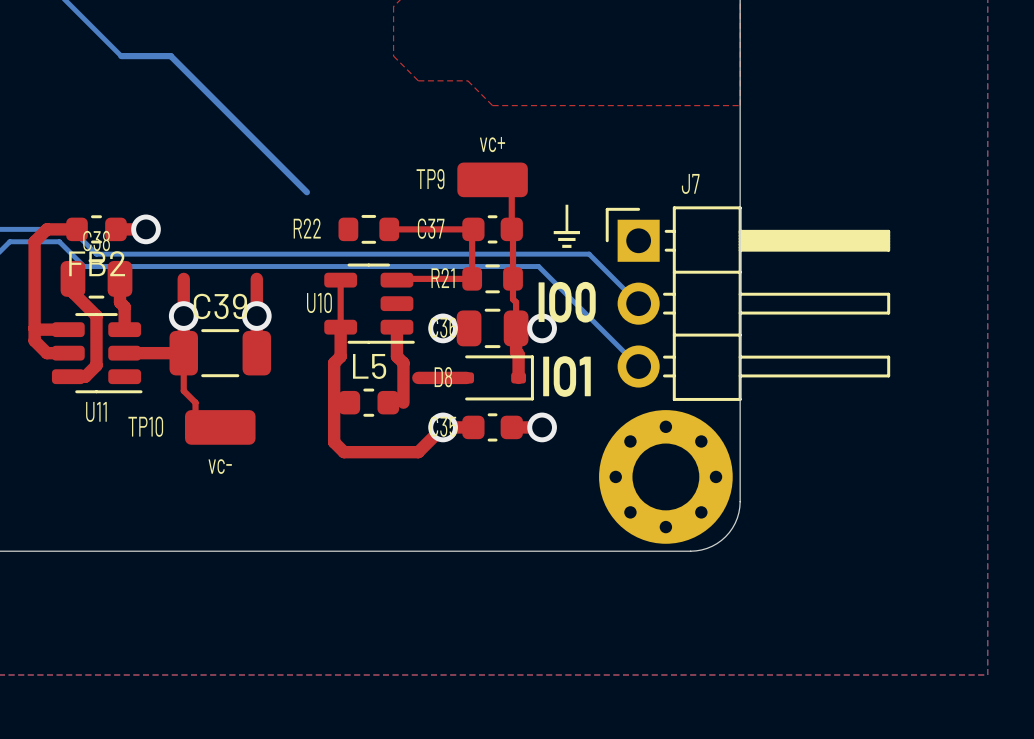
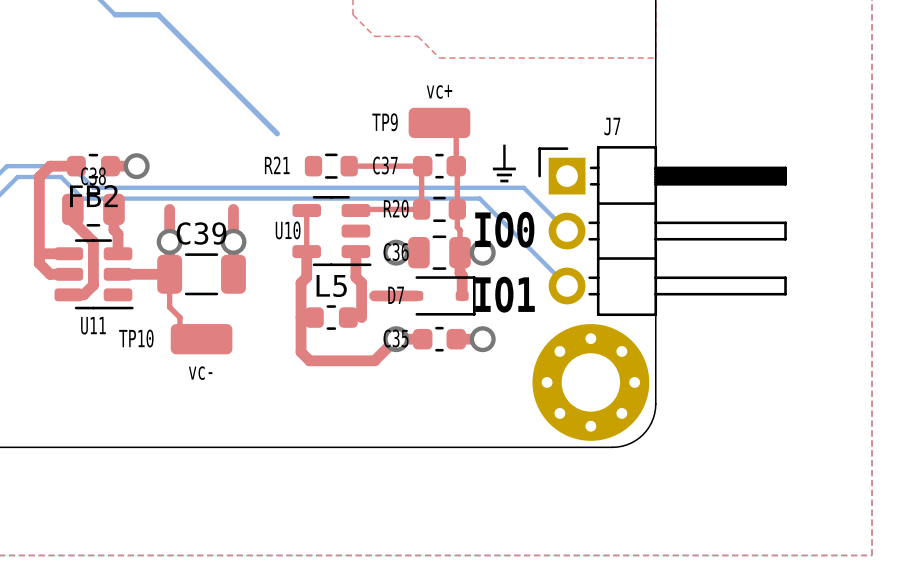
R22 name: R22 (307, 228) -> R21 (277, 165)
R21 name: R21 (443, 278) -> R20 (396, 208)
D8 name: D8 (443, 377) -> D7 (396, 295)

